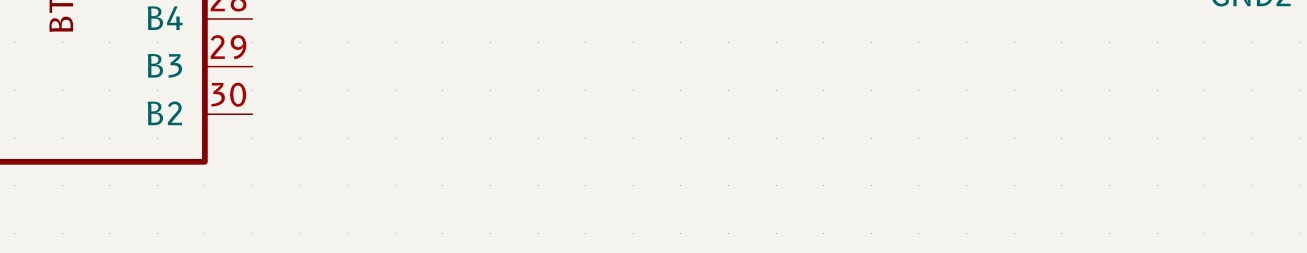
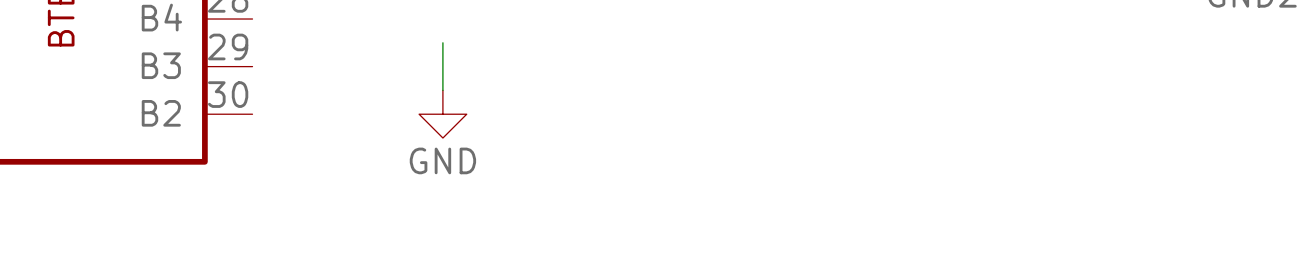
wire: none -> (442, 42) (442, 90)
power symbol: none -> GND (442, 114)

